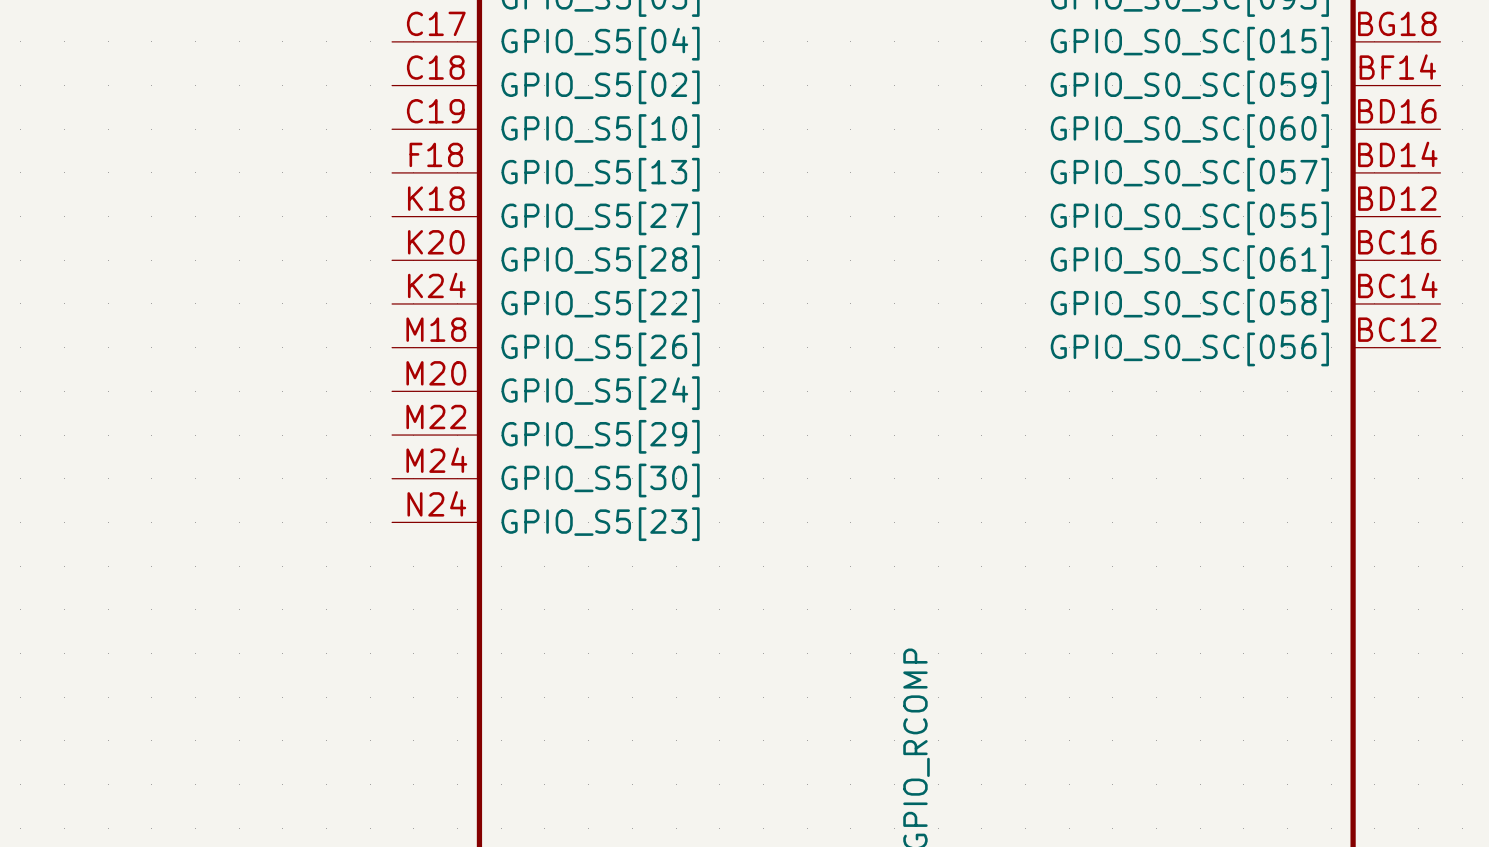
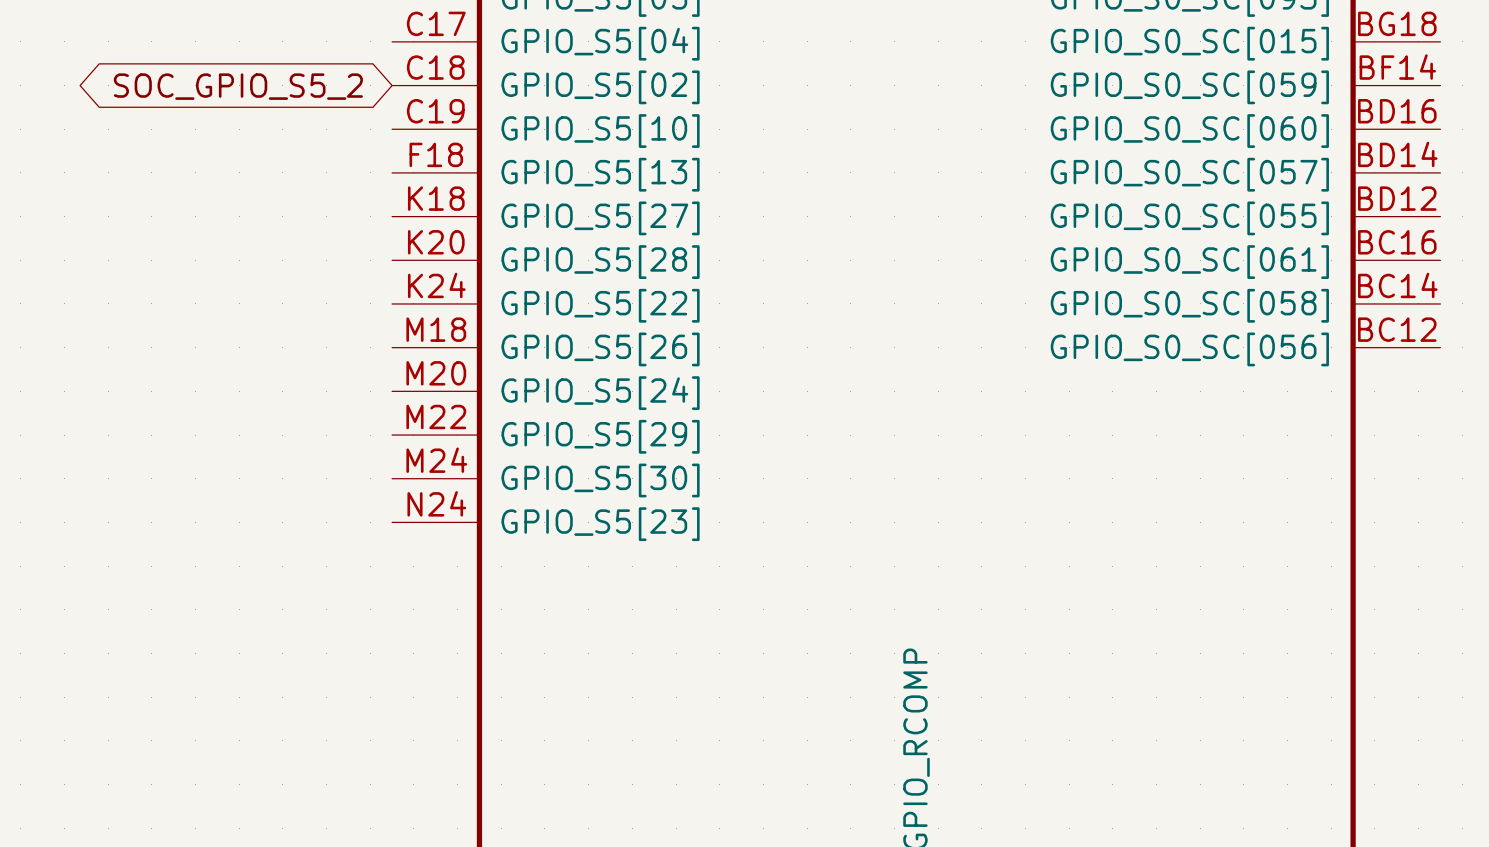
global label: none -> SOC_GPIO_S5_2 (238, 86)

